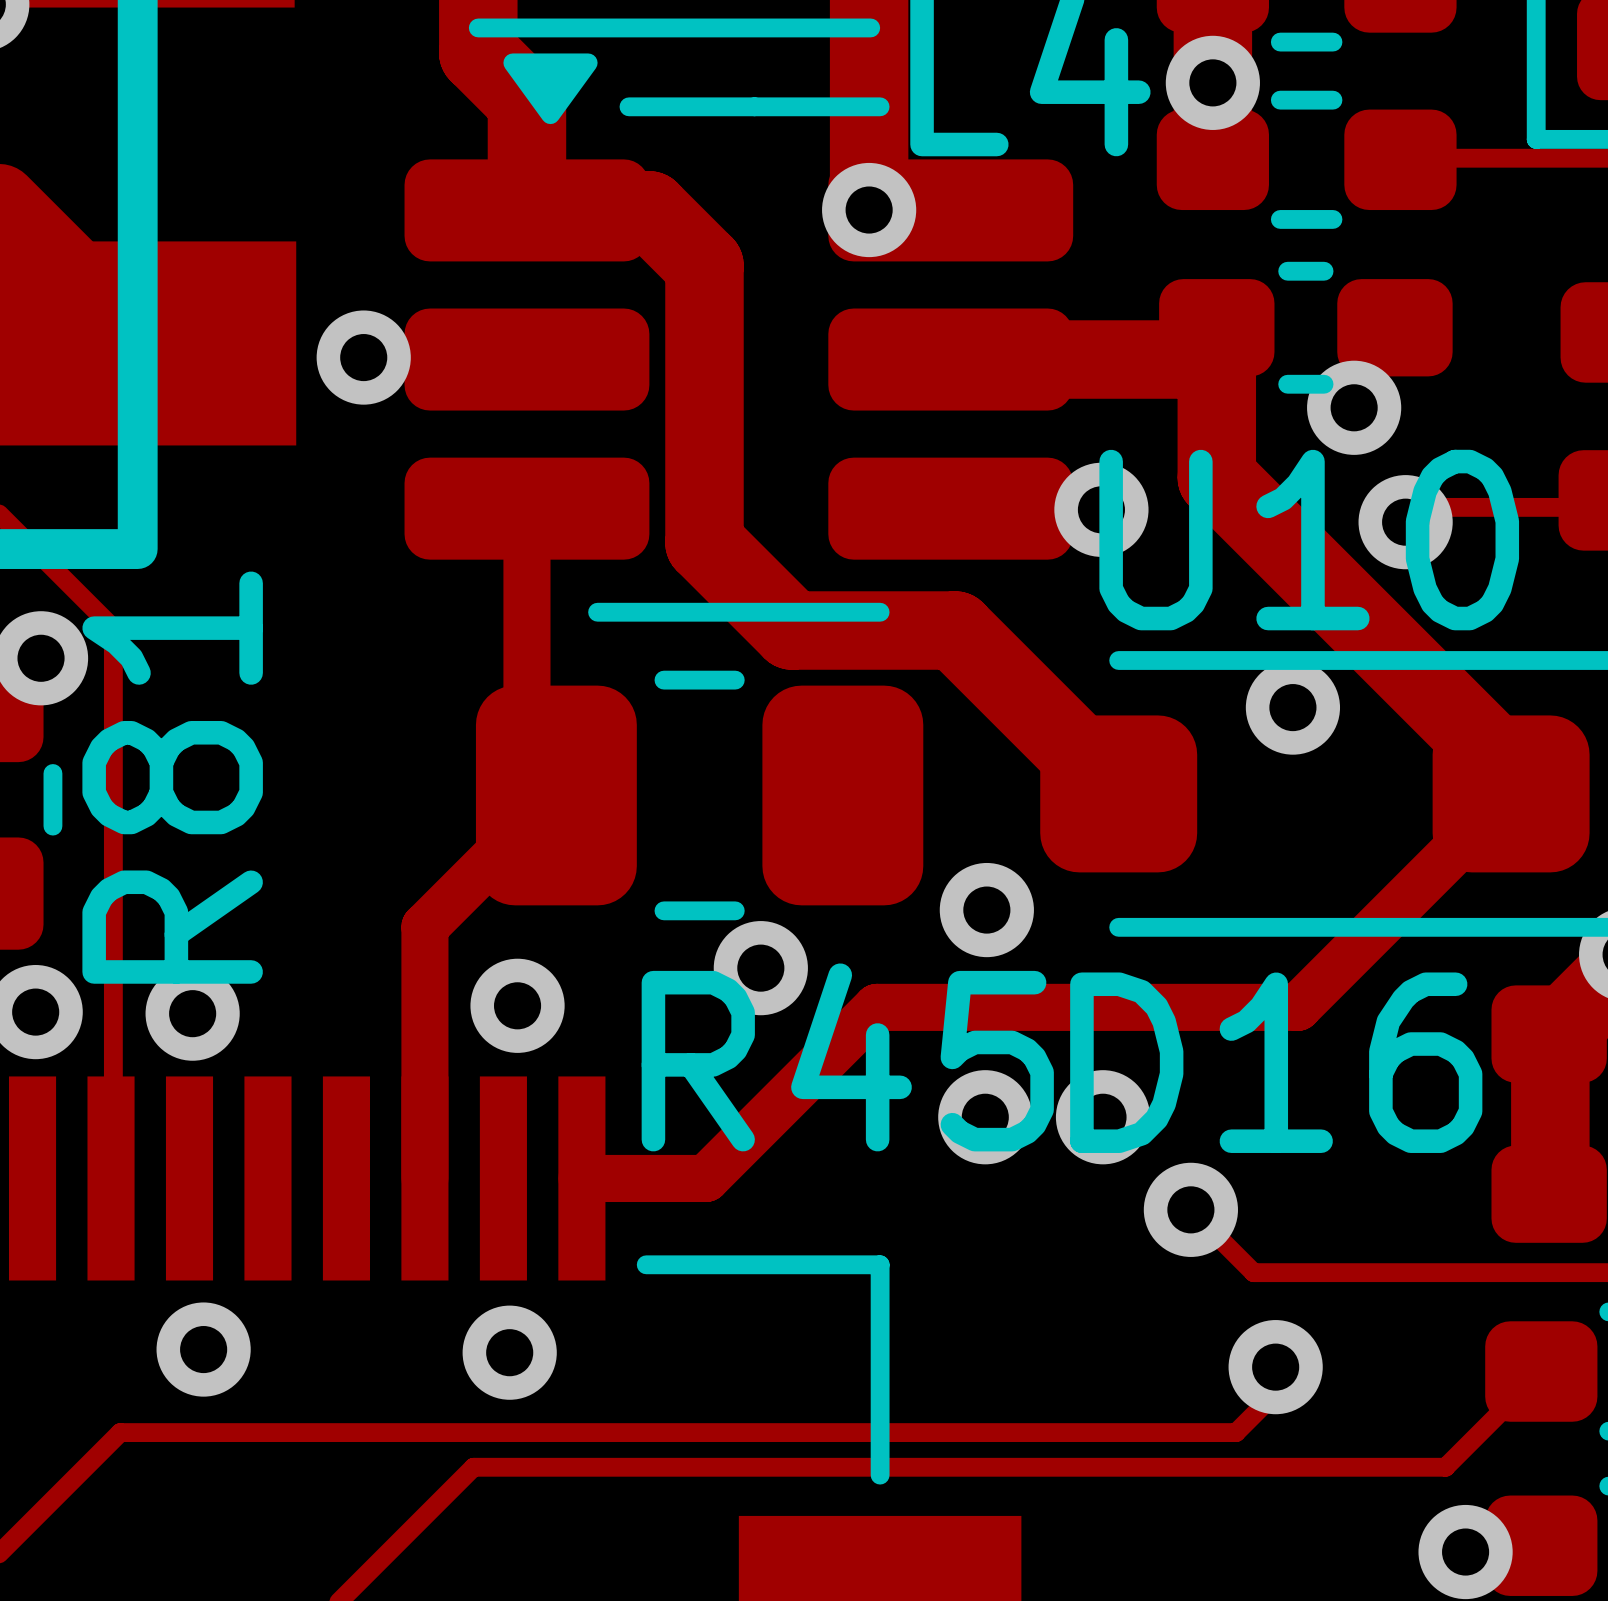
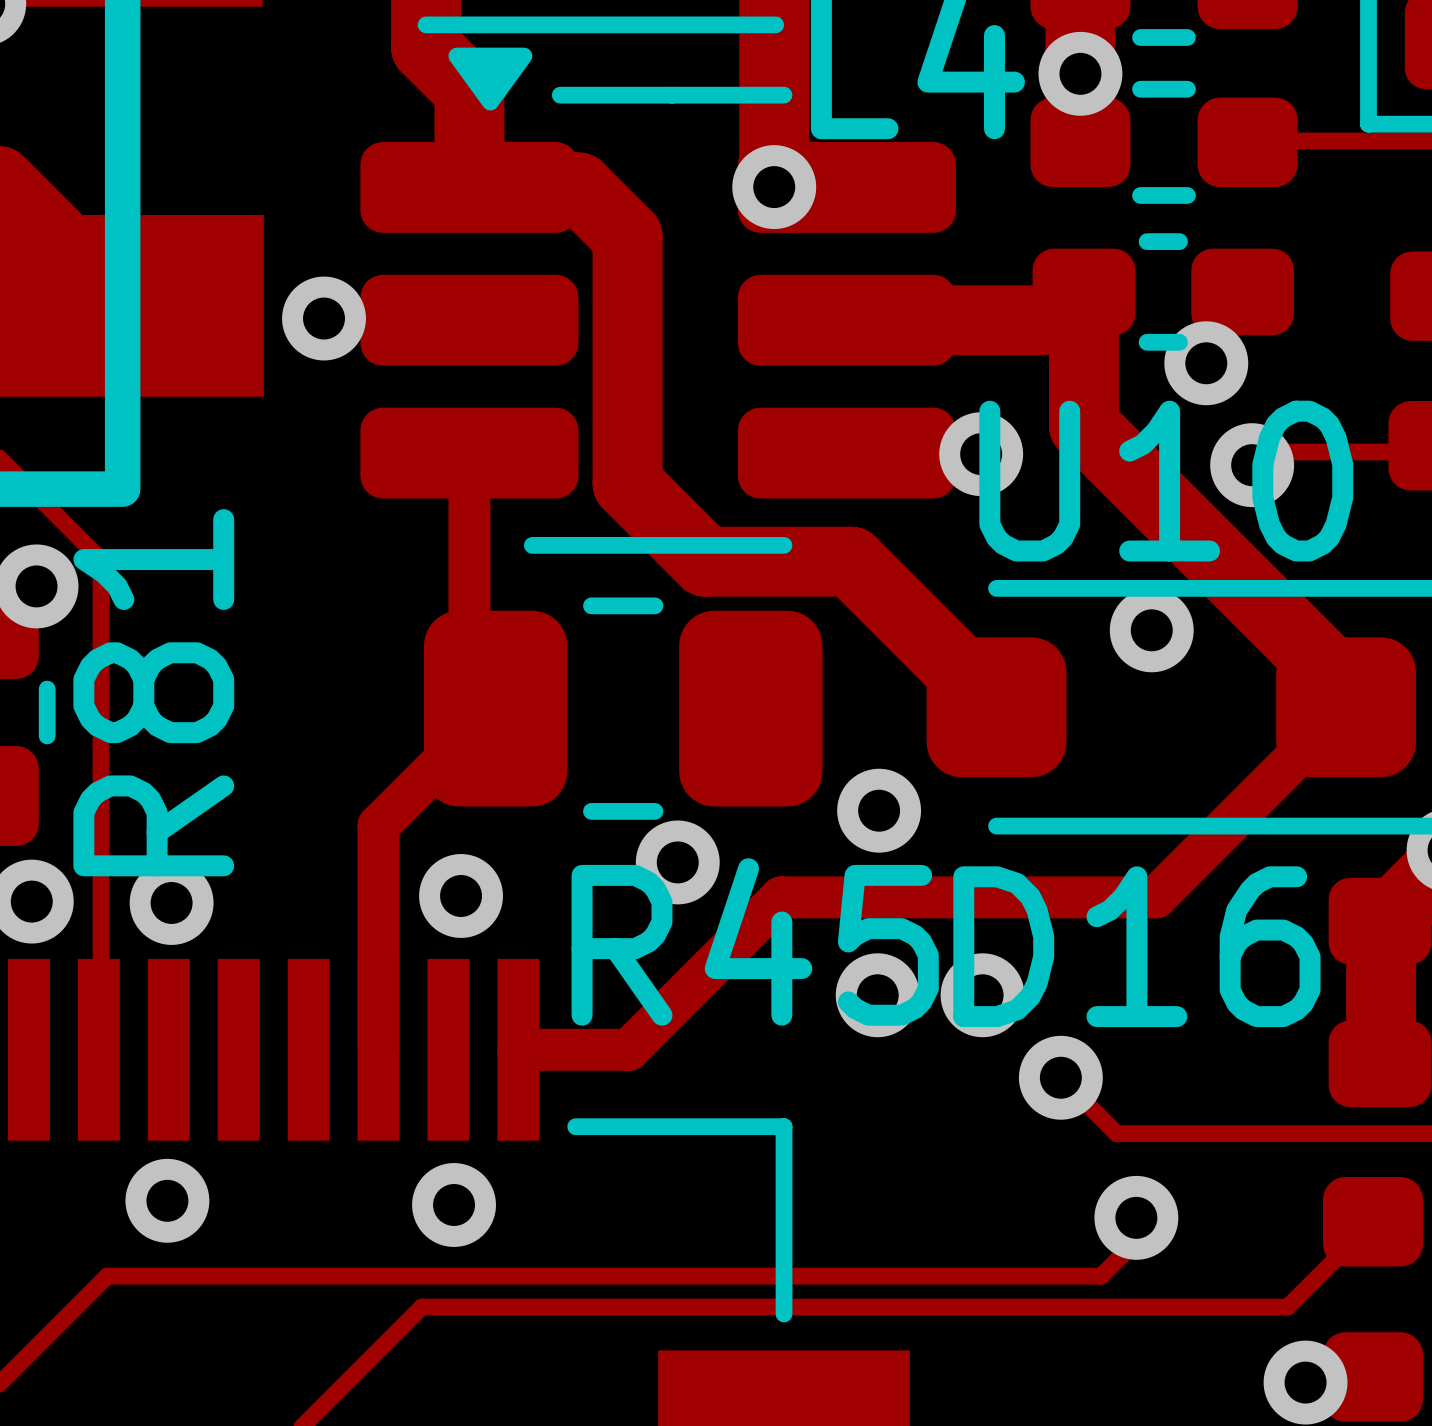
via position: (203, 1349) -> (167, 1200)

